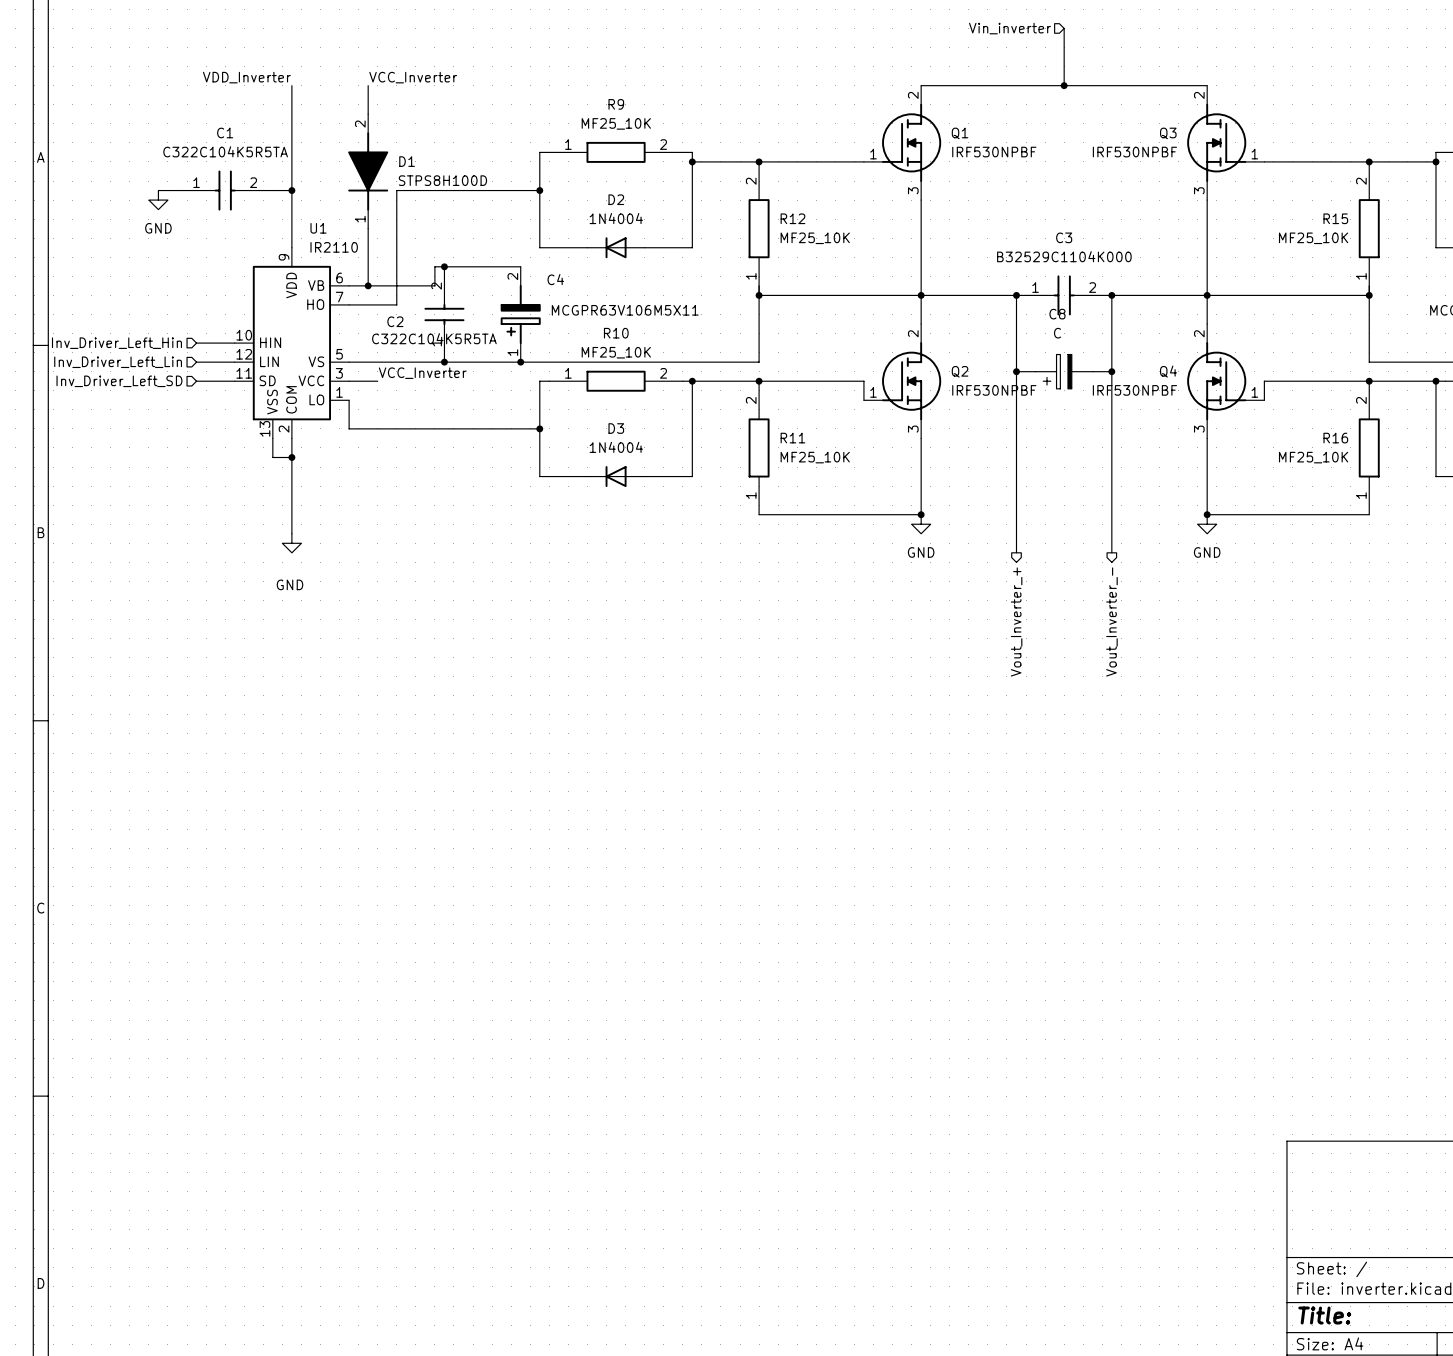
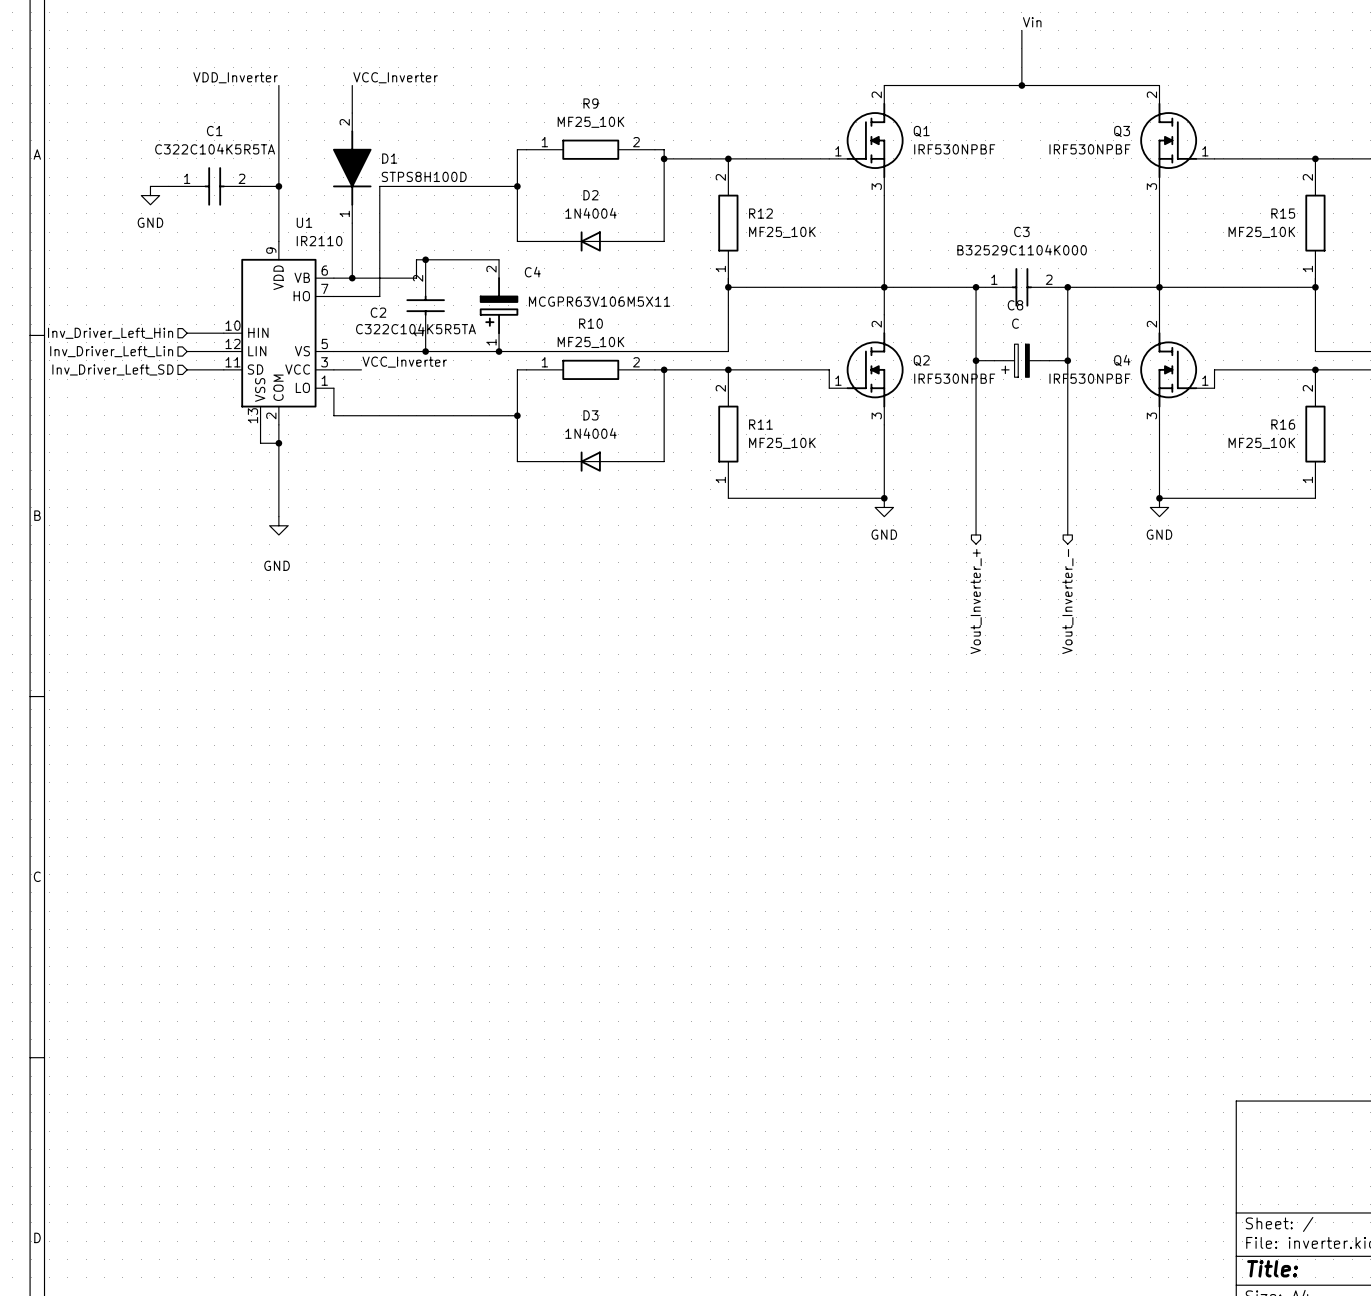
label: none -> Vin (1032, 22)
hierarchical label: Vin_inverter (1009, 28) -> none

